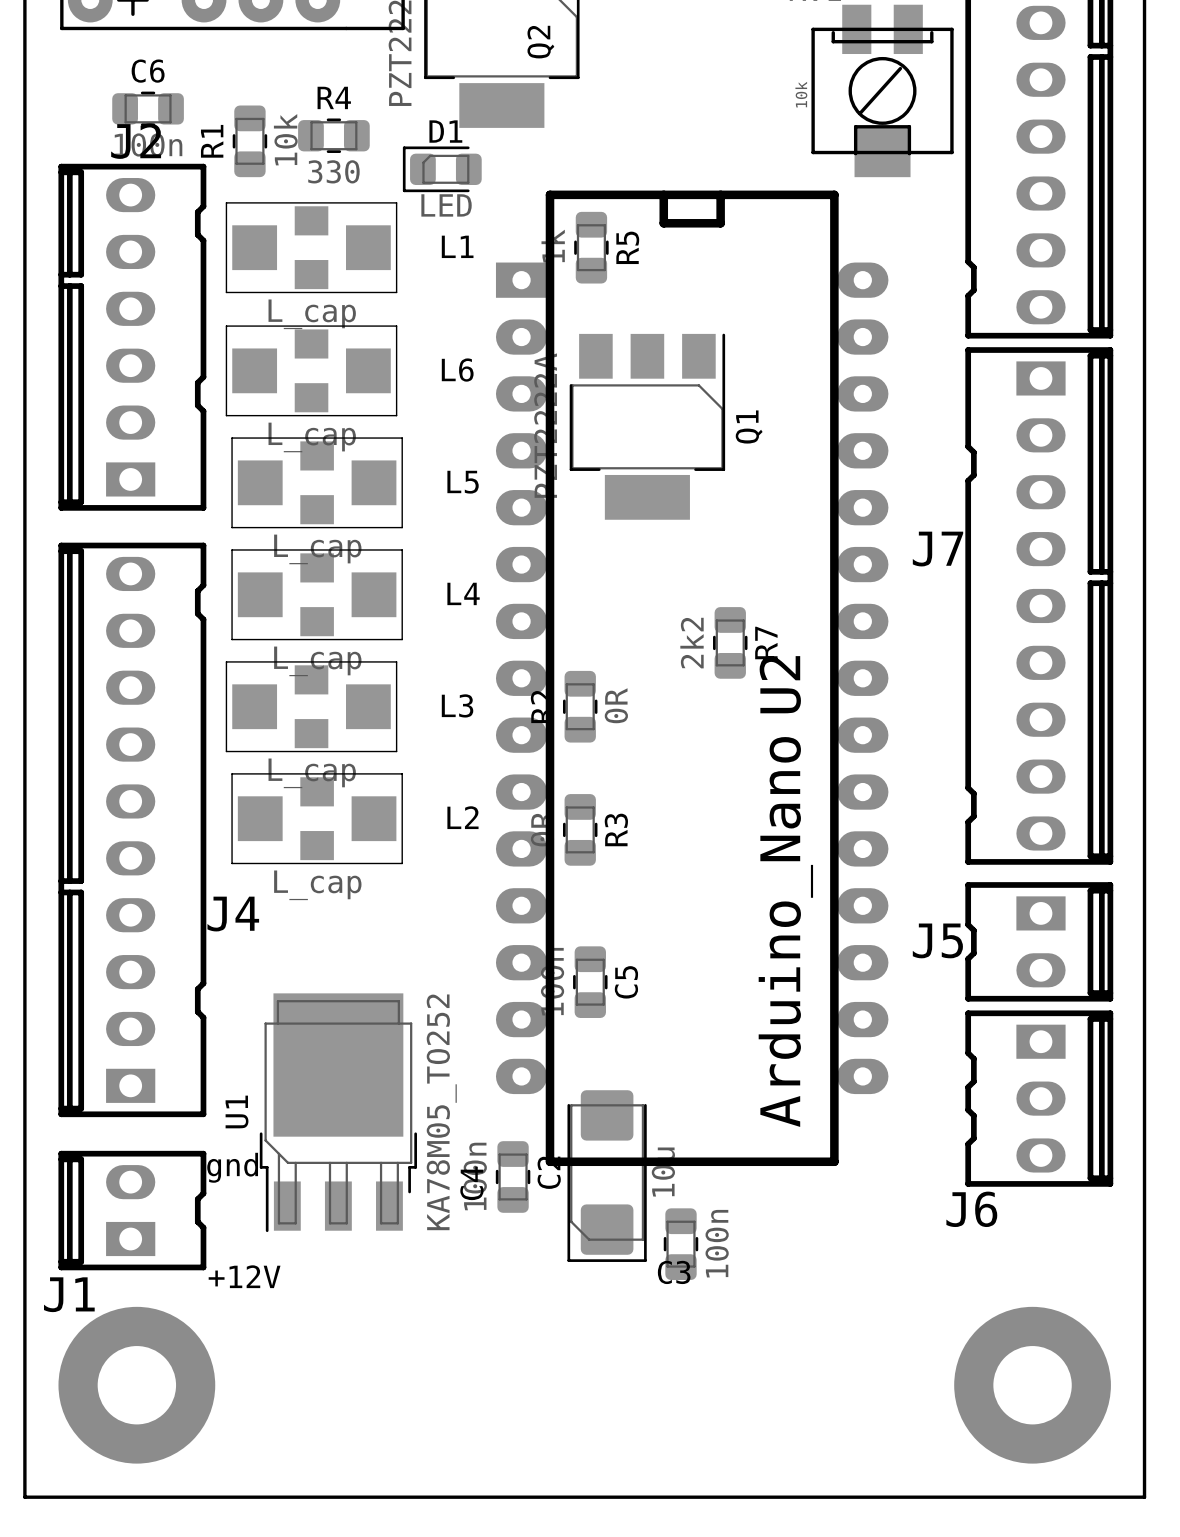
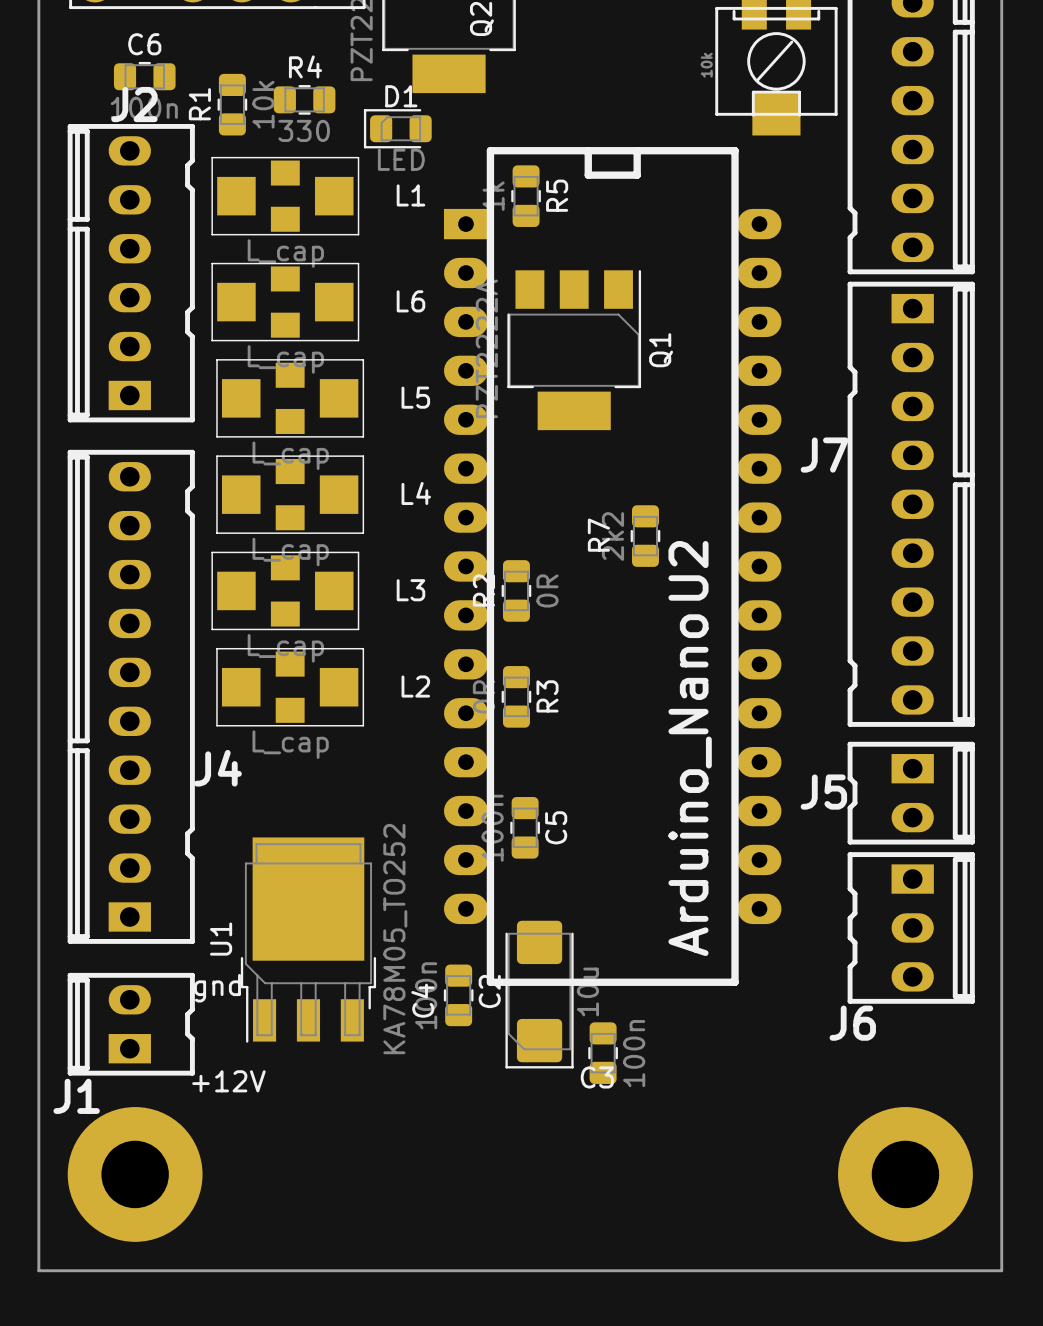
R7 name position: R7 (766, 643) -> R7 (598, 535)

